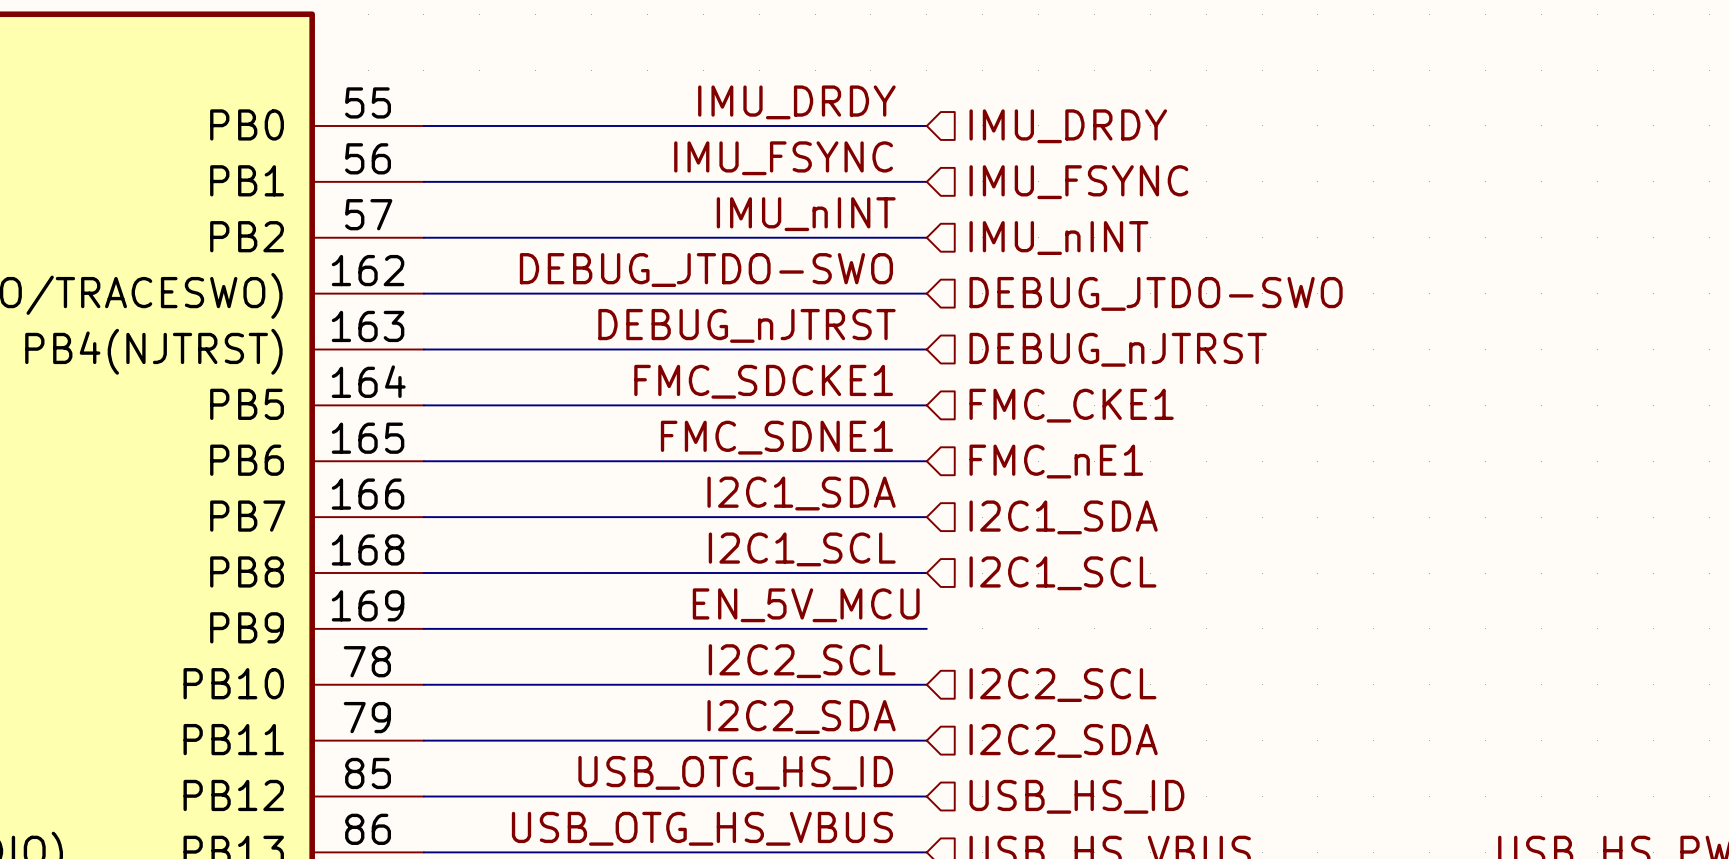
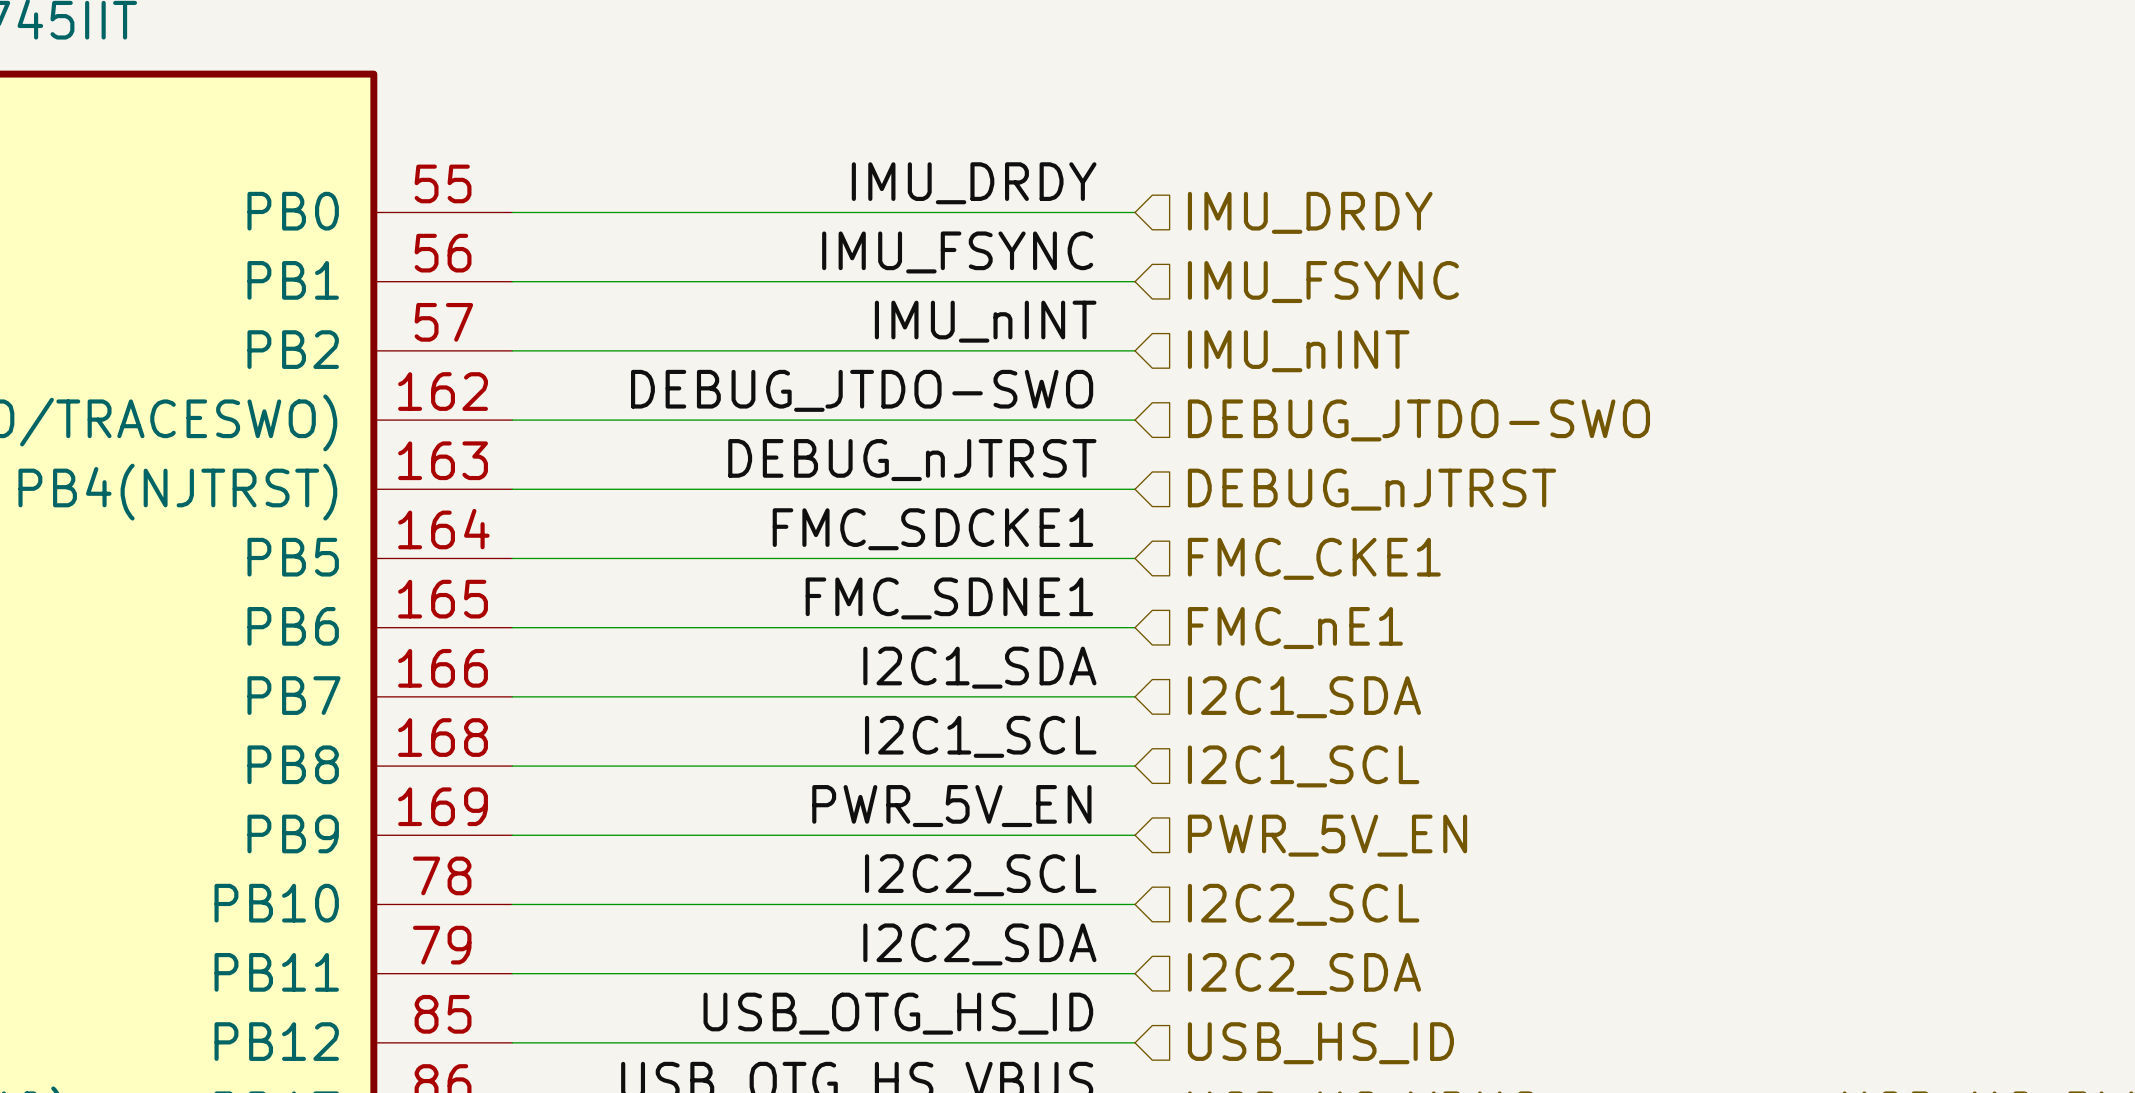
label: none -> PWR_5V_EN (951, 806)
label: EN_5V_MCU (806, 605) -> none
hierarchical label: none -> PWR_5V_EN (1327, 835)

